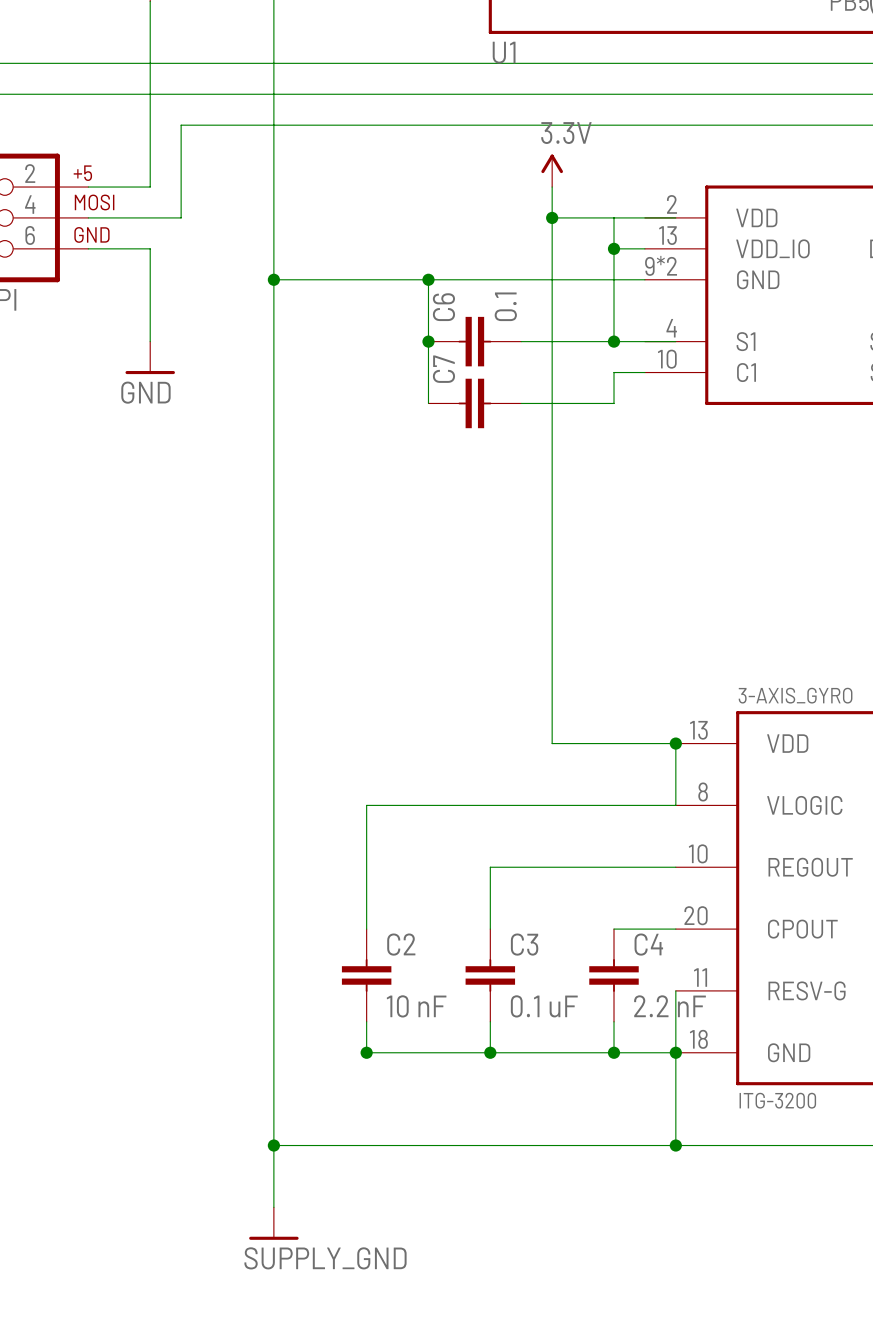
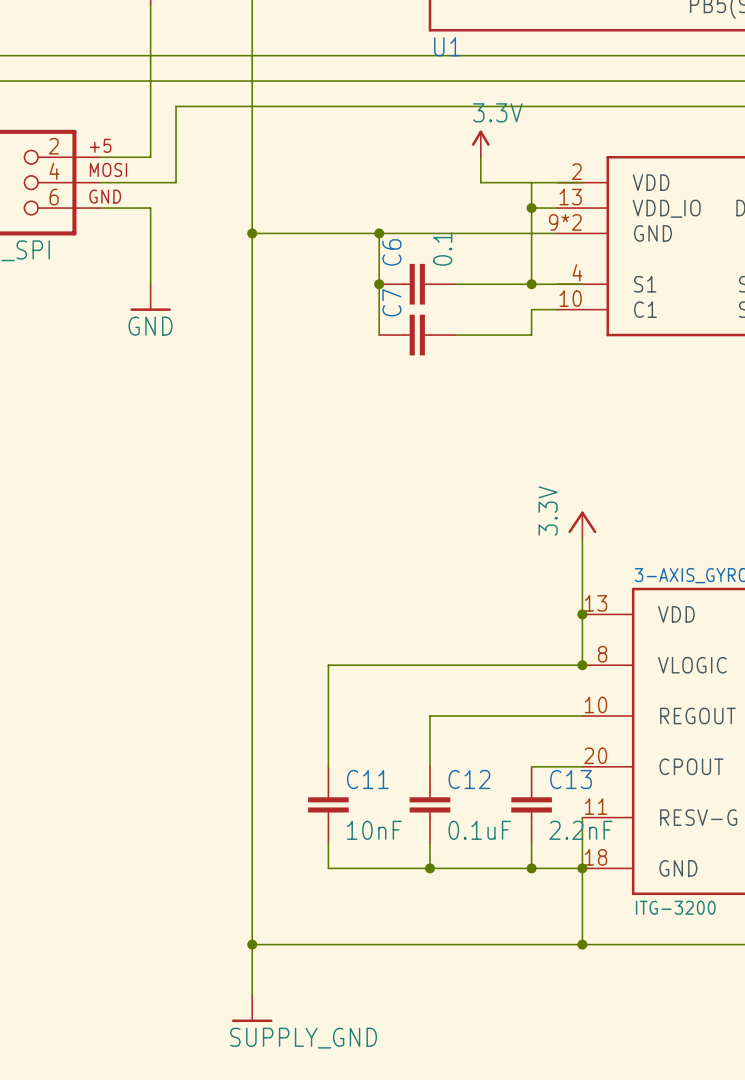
wire: (552, 217) (552, 743) (675, 743) -> (582, 538) (582, 614)
junction: (552, 217) -> none
power symbol: none -> 3.3V (582, 524)
junction: none -> (582, 665)
C2 name: C2 (401, 944) -> C11 (367, 779)
C3 name: C3 (524, 944) -> C12 (469, 779)
C4 name: C4 (648, 944) -> C13 (571, 779)
C2 value: 10 nF (416, 1006) -> 10nF (374, 830)
C3 value: 0.1 uF (544, 1006) -> 0.1uF (479, 830)
C4 value: 2.2 nF (670, 1006) -> 2.2nF (580, 830)
junction: (366, 1052) -> none

